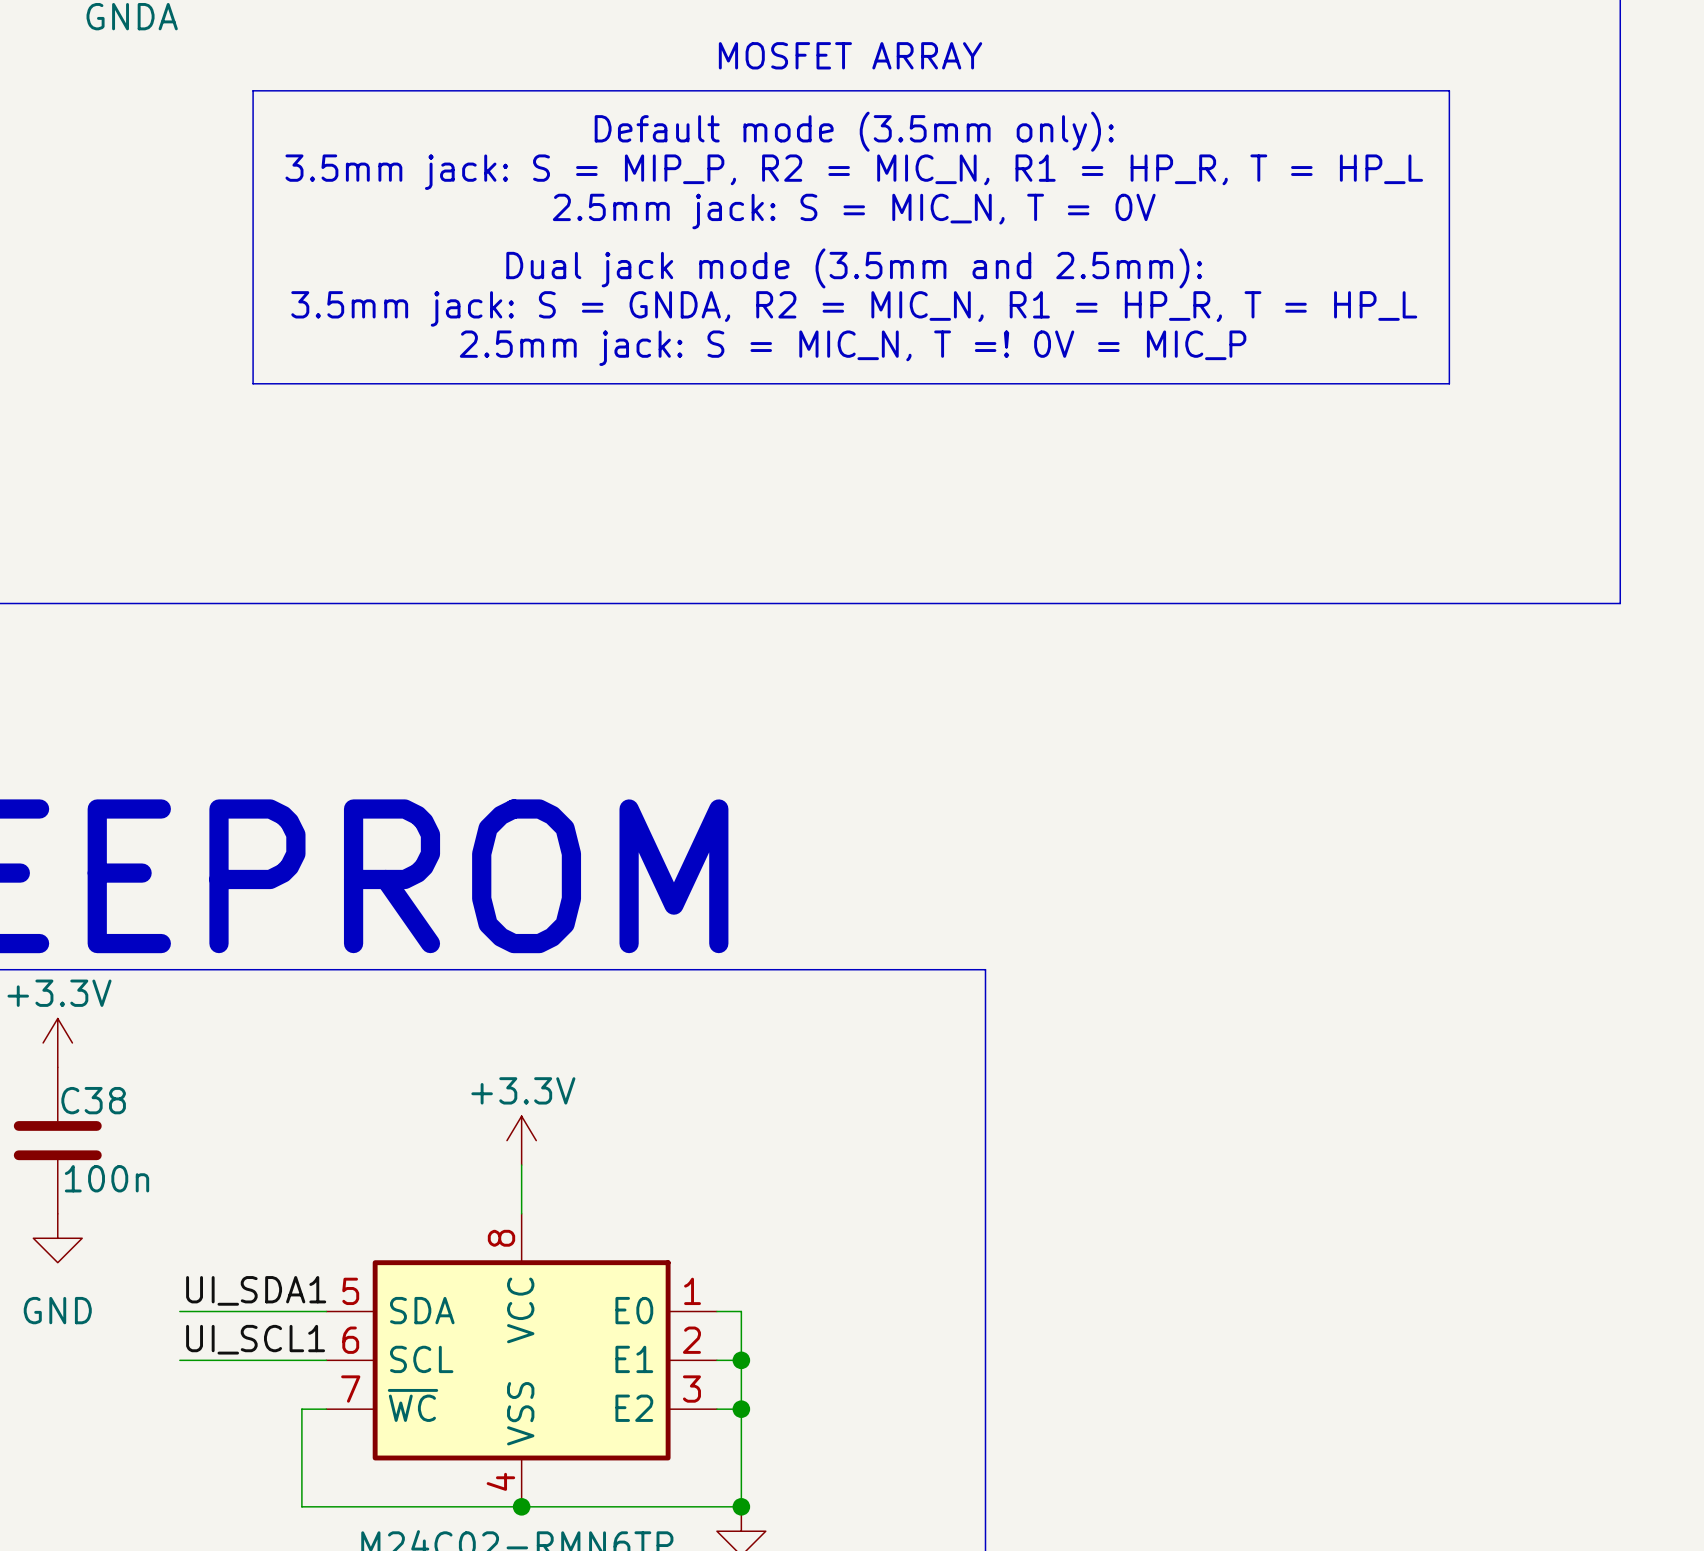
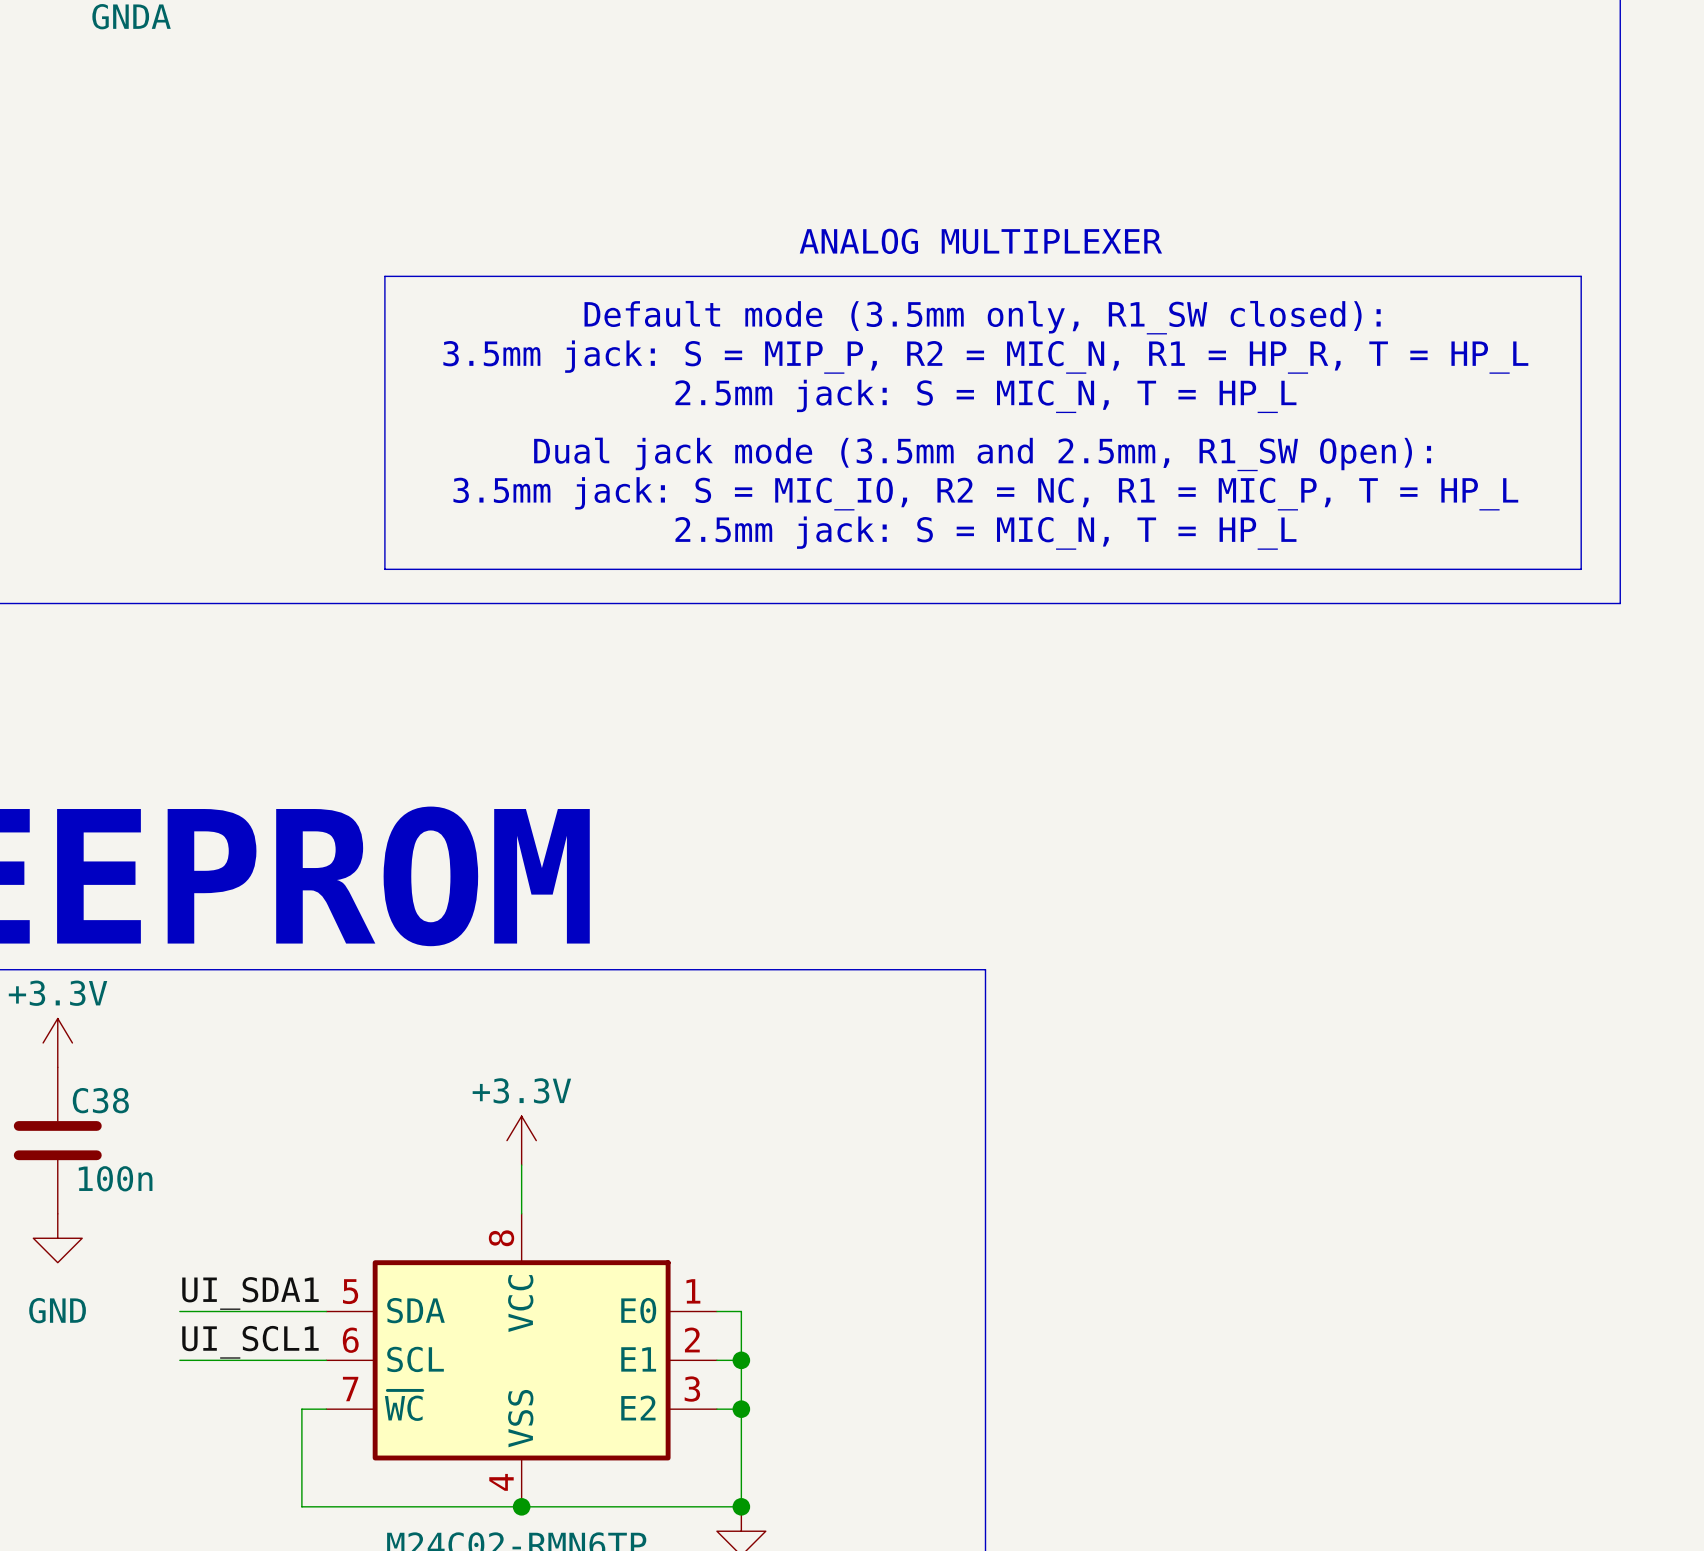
text: MOSFET ARRAY (850, 55) -> none
line: (253, 90) (1449, 90) (1449, 383) (253, 383) (253, 90) -> (384, 276) (1581, 276) (1581, 569) (384, 569) (384, 276)
text: Default mode (3.5mm only): (854, 131) -> none
text position: 3.5mm jack: S = MIP_P, R2 = MIC_N, R1 = HP_R, T = HP_L (854, 172) -> 3.5mm jack: S = MIP_P, R2 = MIC_N, R1 = HP_R, T = HP_L (985, 357)
text: 2.5mm jack: S = MIC_N, T = 0V (854, 211) -> none
text: none -> ANALOG MULTIPLEXER (980, 241)
text: Dual jack mode (3.5mm and 2.5mm): (854, 268) -> none
text: 3.5mm jack: S = GNDA, R2 = MIC_N, R1 = HP_R, T = HP_L (854, 308) -> none
text: none -> Default mode (3.5mm only, R1_SW closed): (982, 317)
text: 2.5mm jack: S = MIC_N, T =! 0V = MIC_P (853, 348) -> 2.5mm jack: S = MIC_N, T = HP_L (985, 396)
text: none -> Dual jack mode (3.5mm and 2.5mm, R1_SW Open): (982, 454)
text: none -> 3.5mm jack: S = MIC_IO, R2 = NC, R1 = MIC_P, T = HP_L (985, 493)
text: none -> 2.5mm jack: S = MIC_N, T = HP_L (985, 533)

